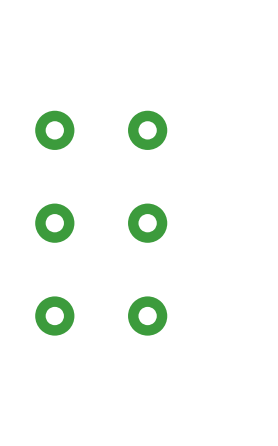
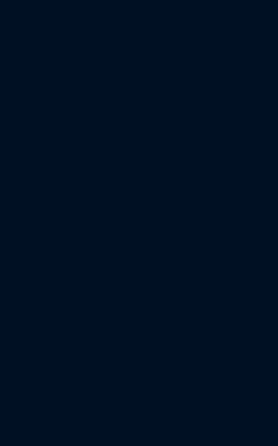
part: (54, 130) -> none
part: (147, 130) -> none
part: (54, 223) -> none
part: (147, 223) -> none
part: (54, 316) -> none
part: (147, 316) -> none

